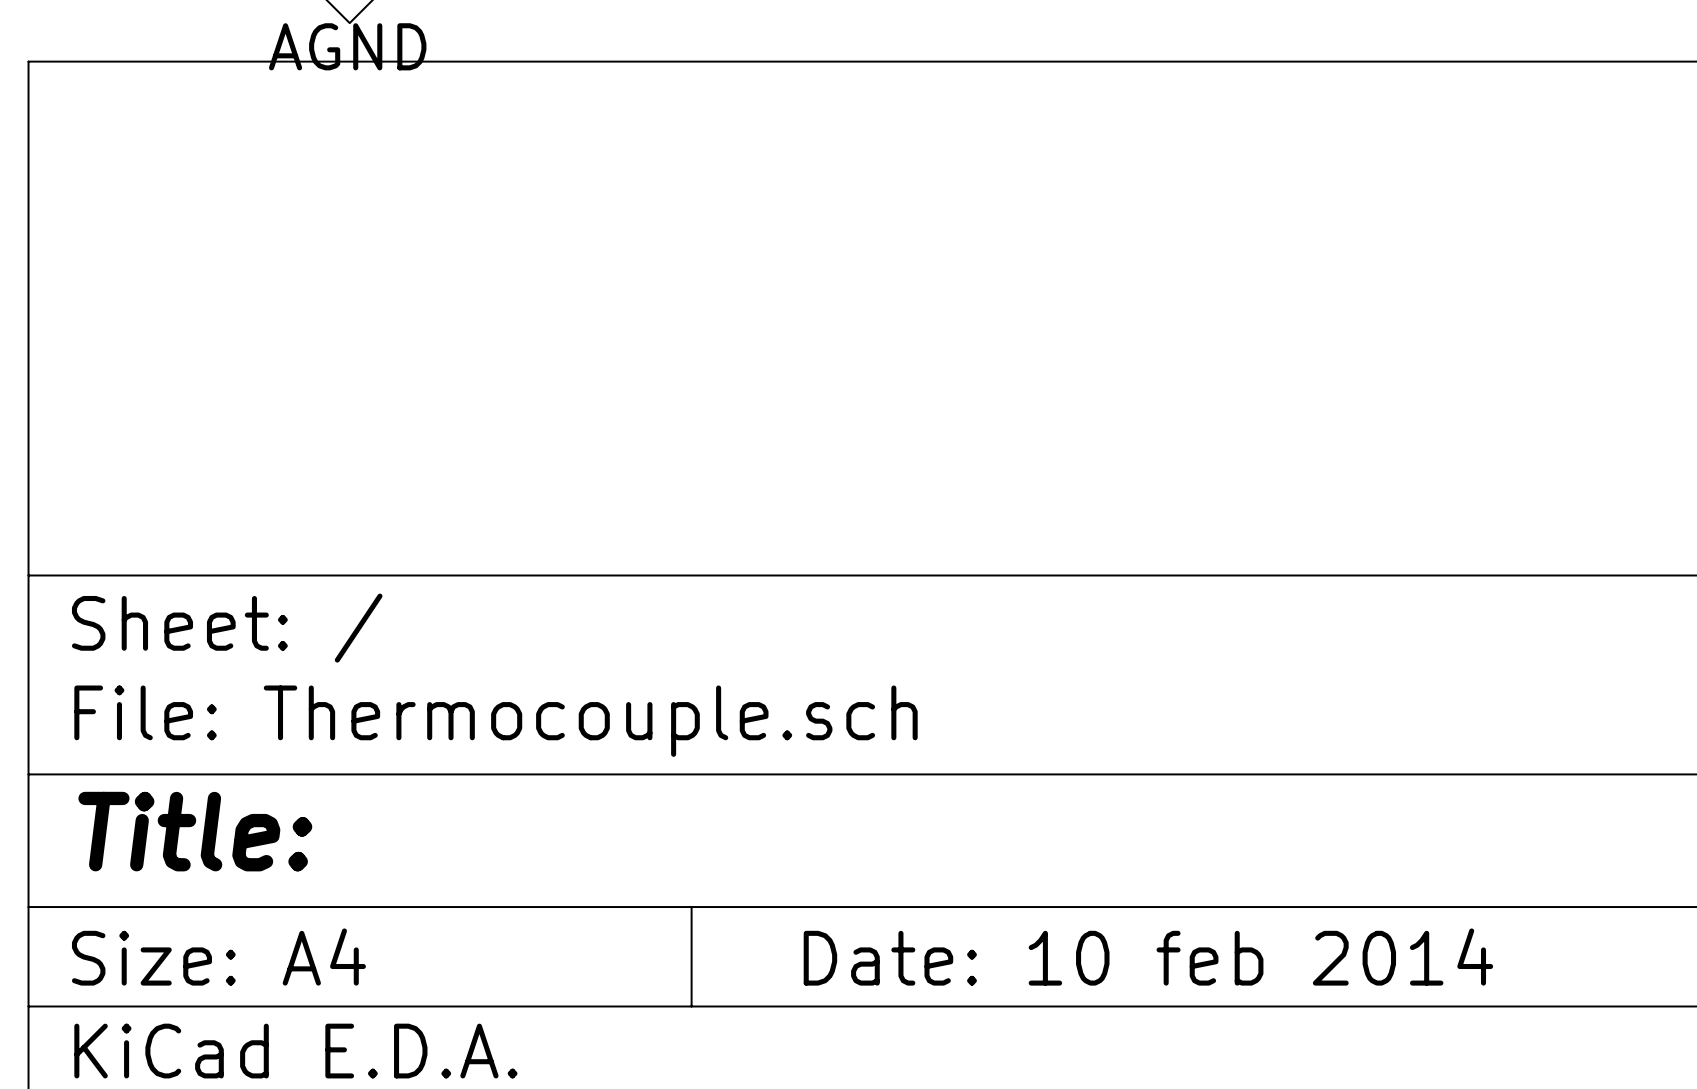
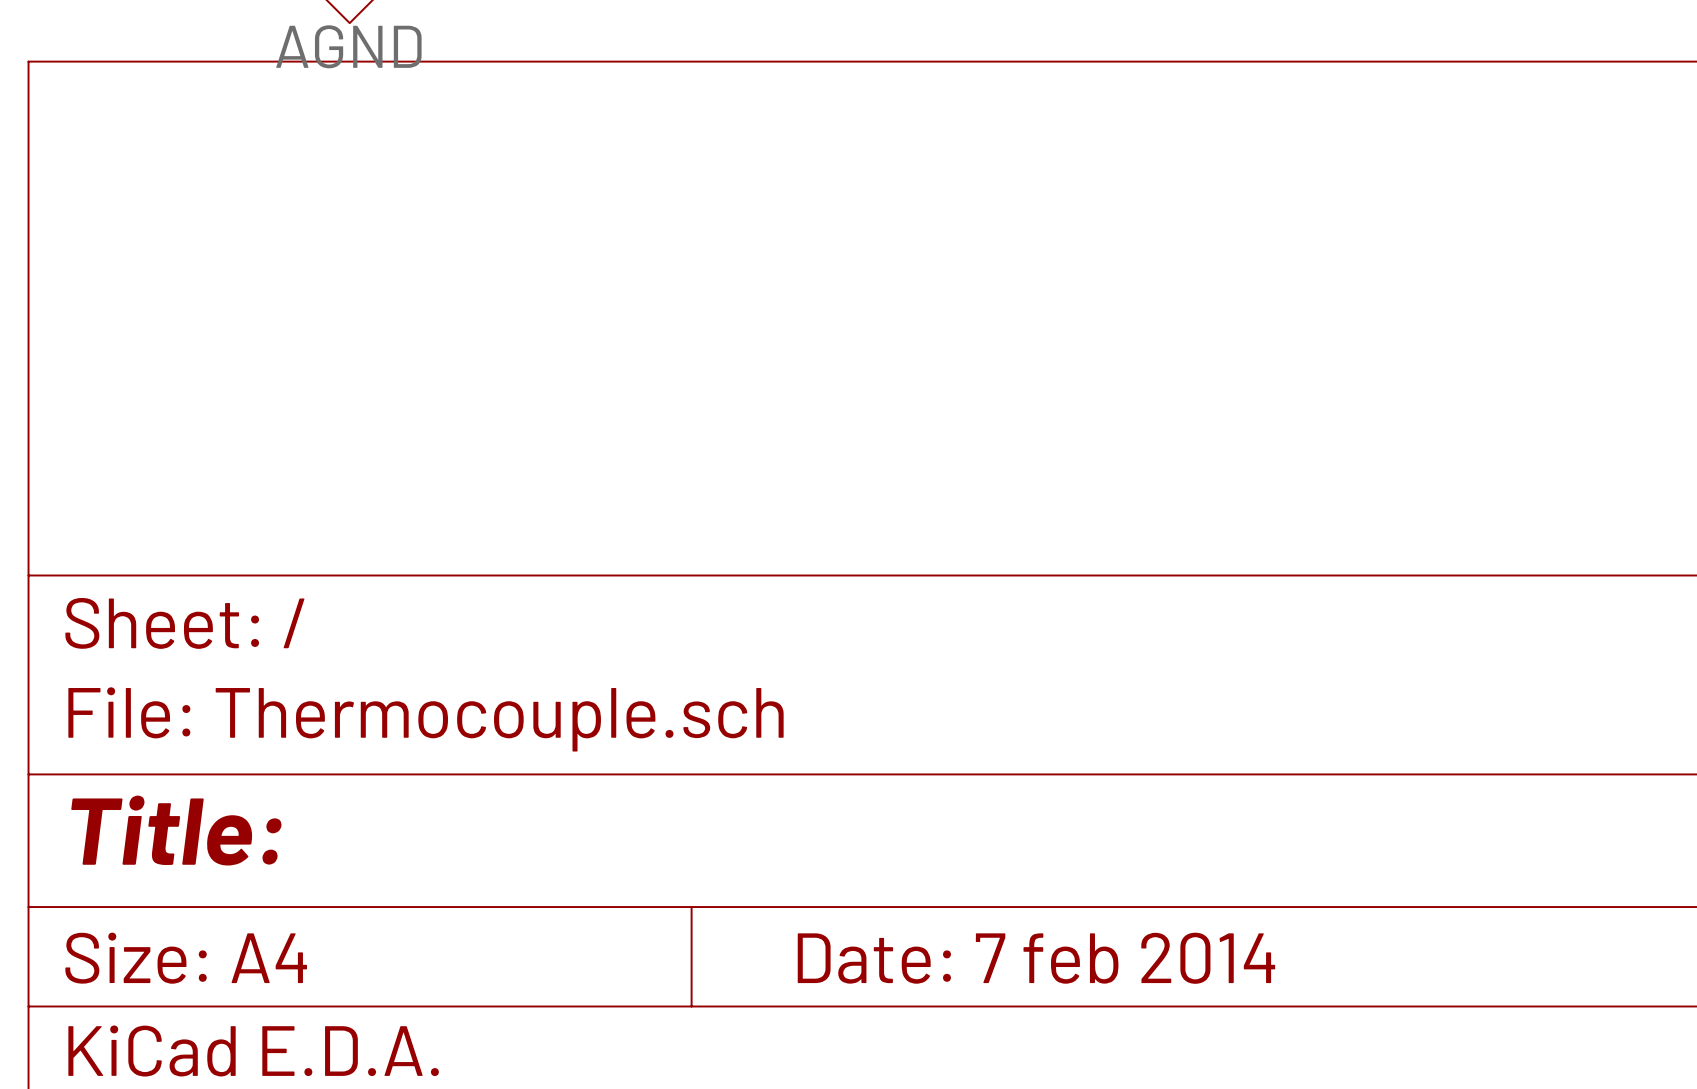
title block: Date: 10 feb 2014 (1148, 957) -> Date: 7 feb 2014 (1036, 958)

